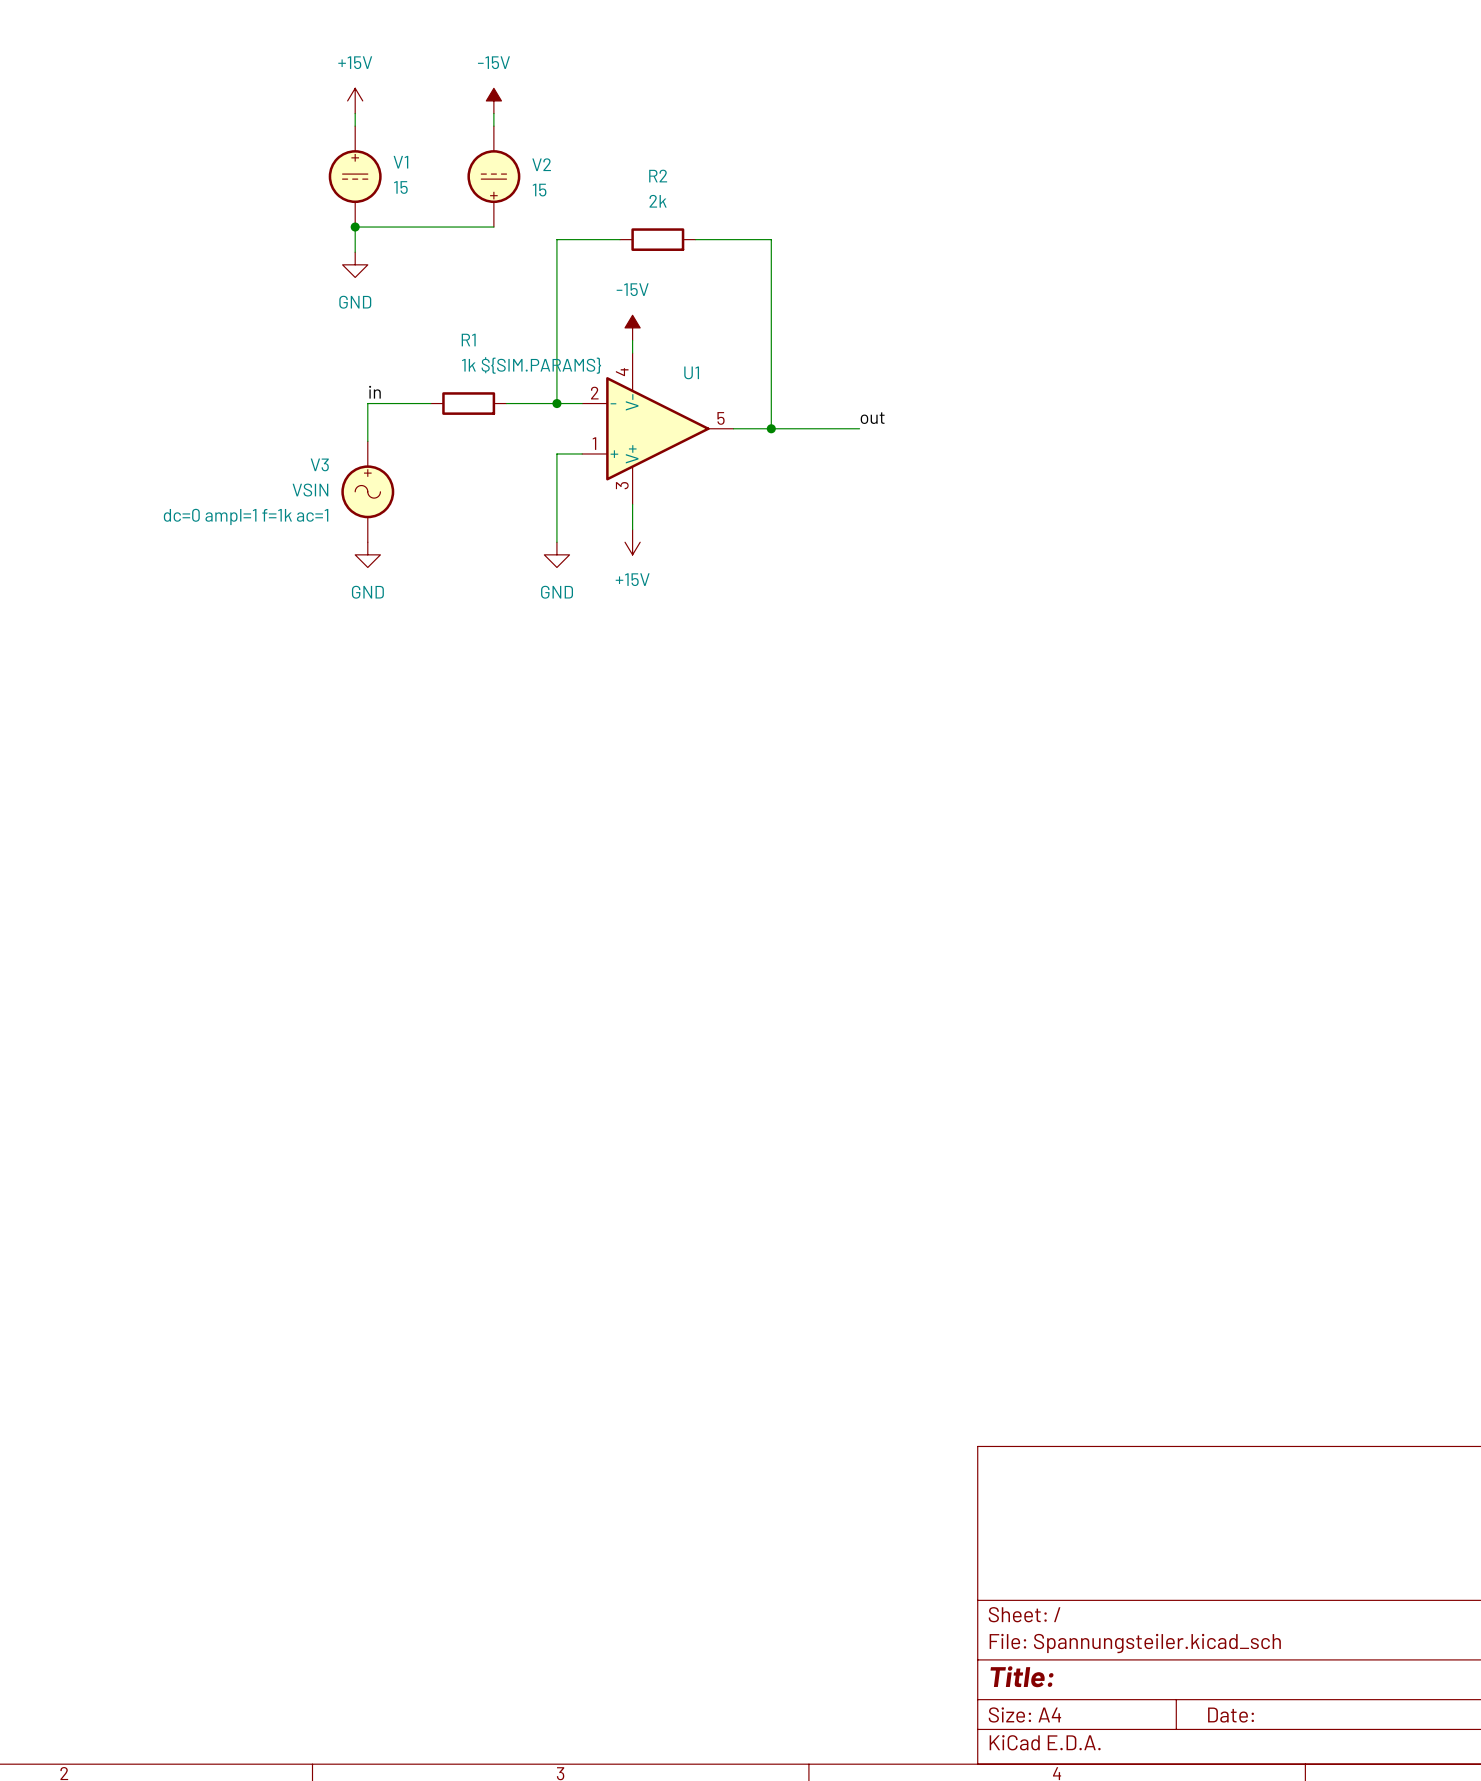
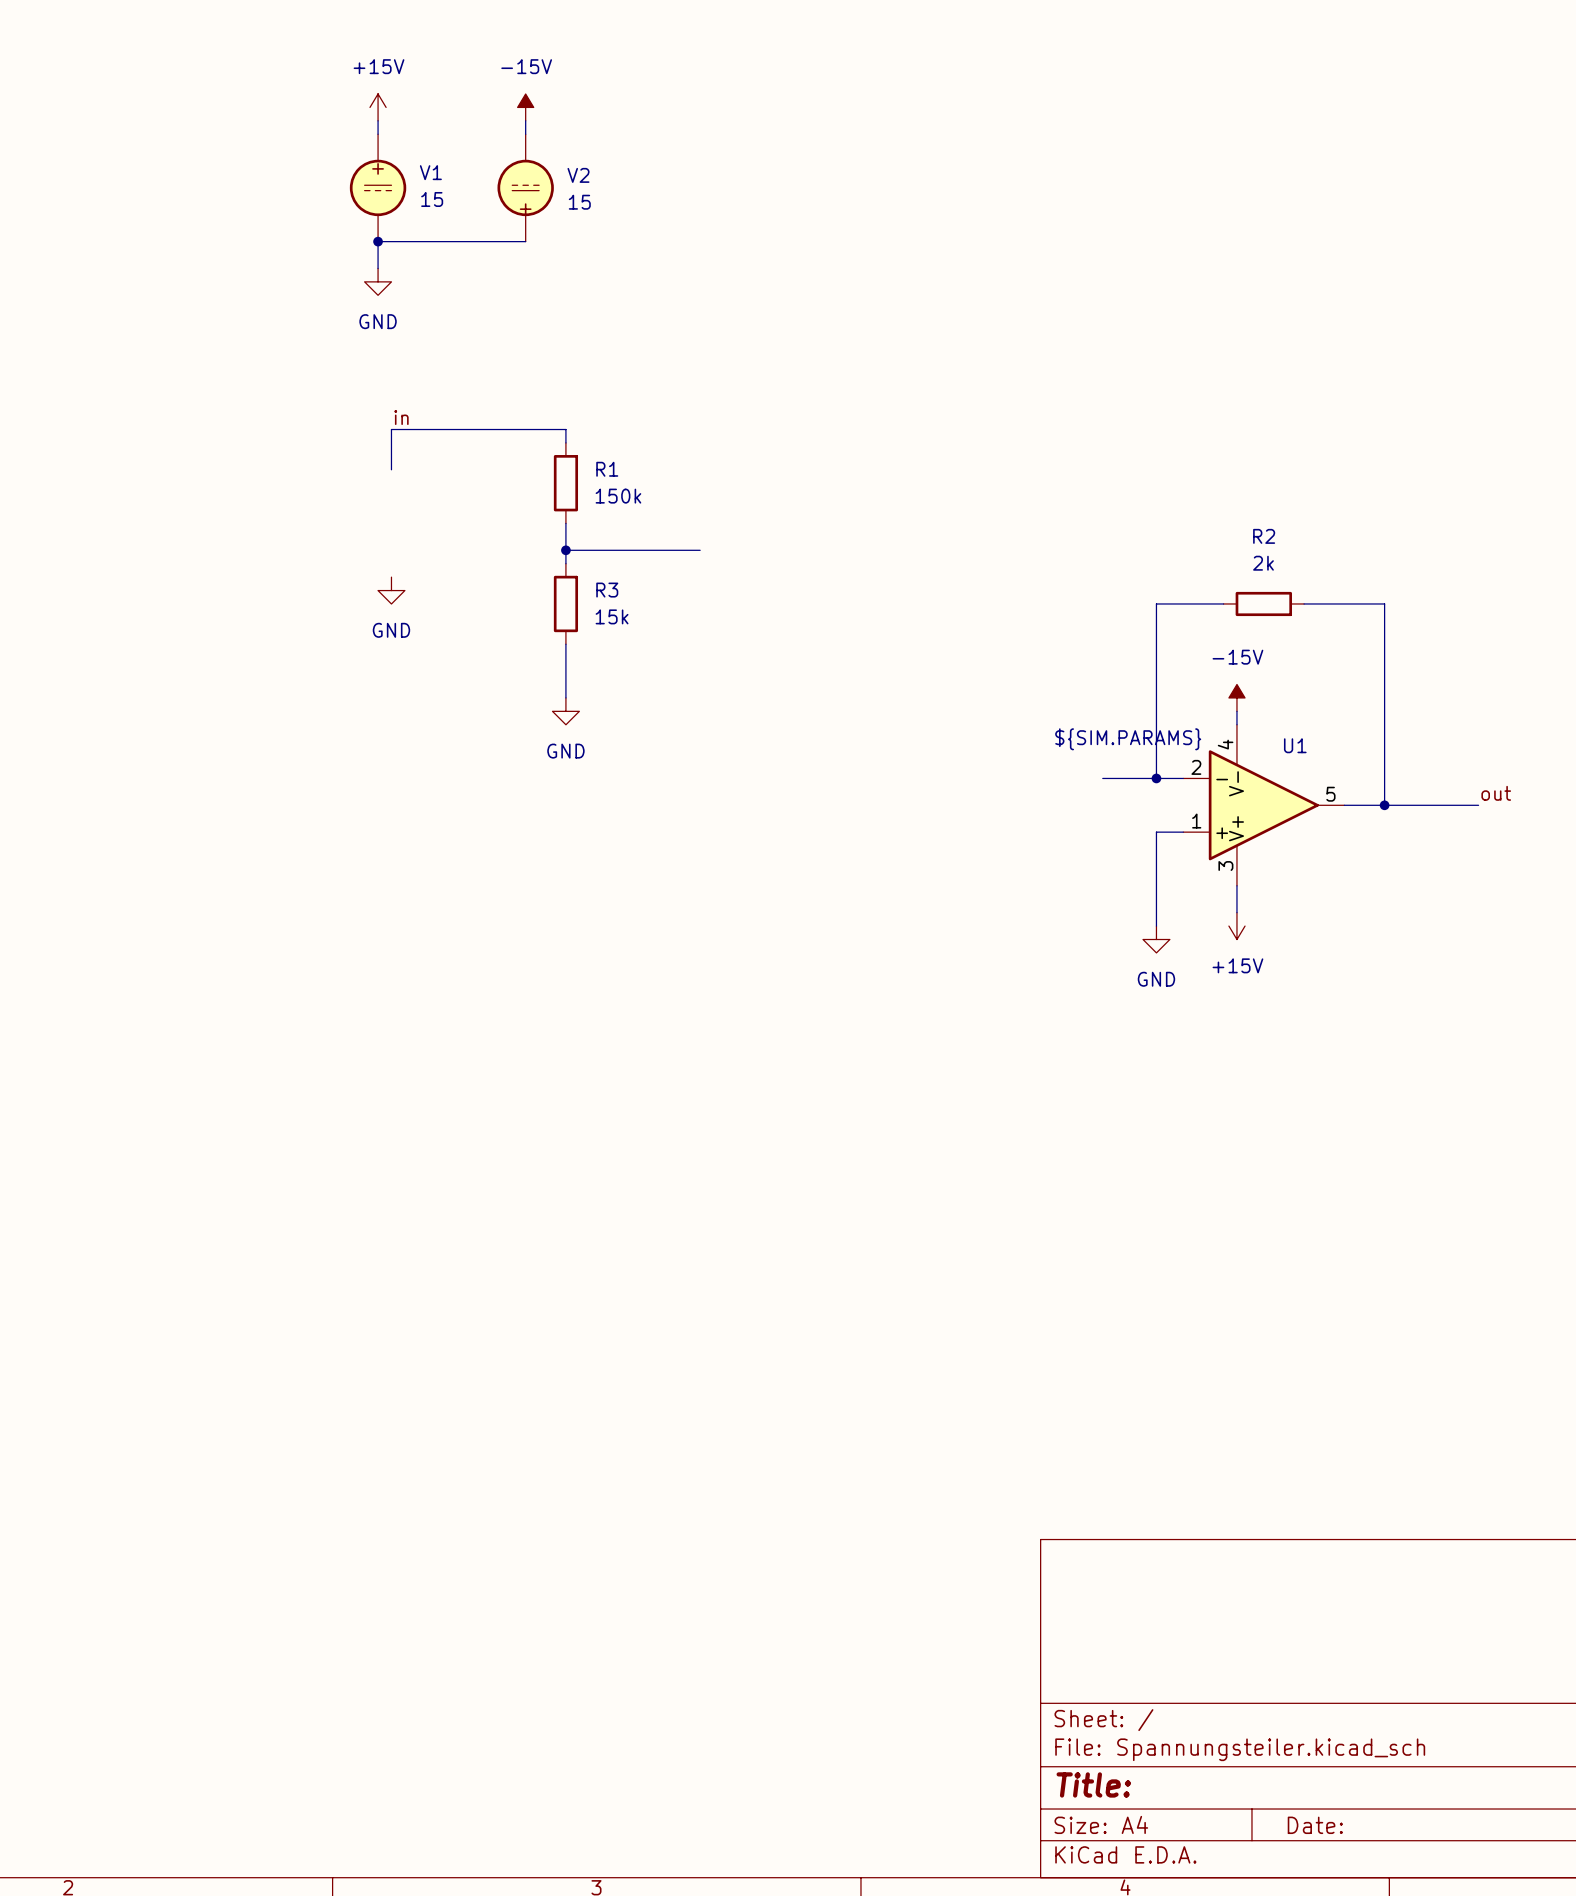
wire: (619, 239) (556, 239) (556, 403) -> none
R2 position: (657, 239) -> (1263, 603)
wire: (695, 239) (771, 239) (771, 428) -> none
power symbol: -15V (632, 327) -> none
R1 name position: R1 (468, 340) -> R1 (607, 469)
wire: (632, 340) (632, 353) -> none
R1 value: 1k (468, 365) -> 150k (618, 496)
wire: none -> (458, 429) (539, 429)
R1 rotation: 0° (468, 403) -> 90° clockwise (565, 483)
R1 position: (468, 403) -> (565, 483)
wire: (531, 403) (582, 403) -> (565, 429) (565, 442)
junction: (556, 403) -> none
label: out (872, 418) -> none
U1 position: (657, 428) -> (1263, 805)
wire: (733, 428) (859, 428) -> (565, 550) (700, 550)
junction: (771, 428) -> none
wire: (582, 453) (556, 453) (556, 542) -> none
V3: VSIN (367, 491) -> none
wire: none -> (565, 523) (565, 563)
wire: (632, 504) (632, 529) -> none
junction: none -> (565, 550)
power symbol: +15V (632, 542) -> none
power symbol position: GND (556, 554) -> GND (565, 711)
R3: none -> 15k (565, 603)
wire: none -> (1223, 603) (1156, 603) (1156, 778)
wire: none -> (1304, 603) (1384, 603) (1384, 805)
wire: none -> (565, 644) (565, 697)
power symbol: none -> -15V (1236, 697)
wire: none -> (1236, 711) (1236, 724)
wire: none -> (1102, 778) (1183, 778)
junction: none -> (1156, 778)
label: none -> out (1496, 793)
wire: none -> (1344, 805) (1478, 805)
junction: none -> (1384, 805)
wire: none -> (1183, 832) (1156, 832) (1156, 926)
wire: none -> (1236, 885) (1236, 912)
power symbol: none -> +15V (1236, 926)
power symbol: none -> GND (1156, 939)

